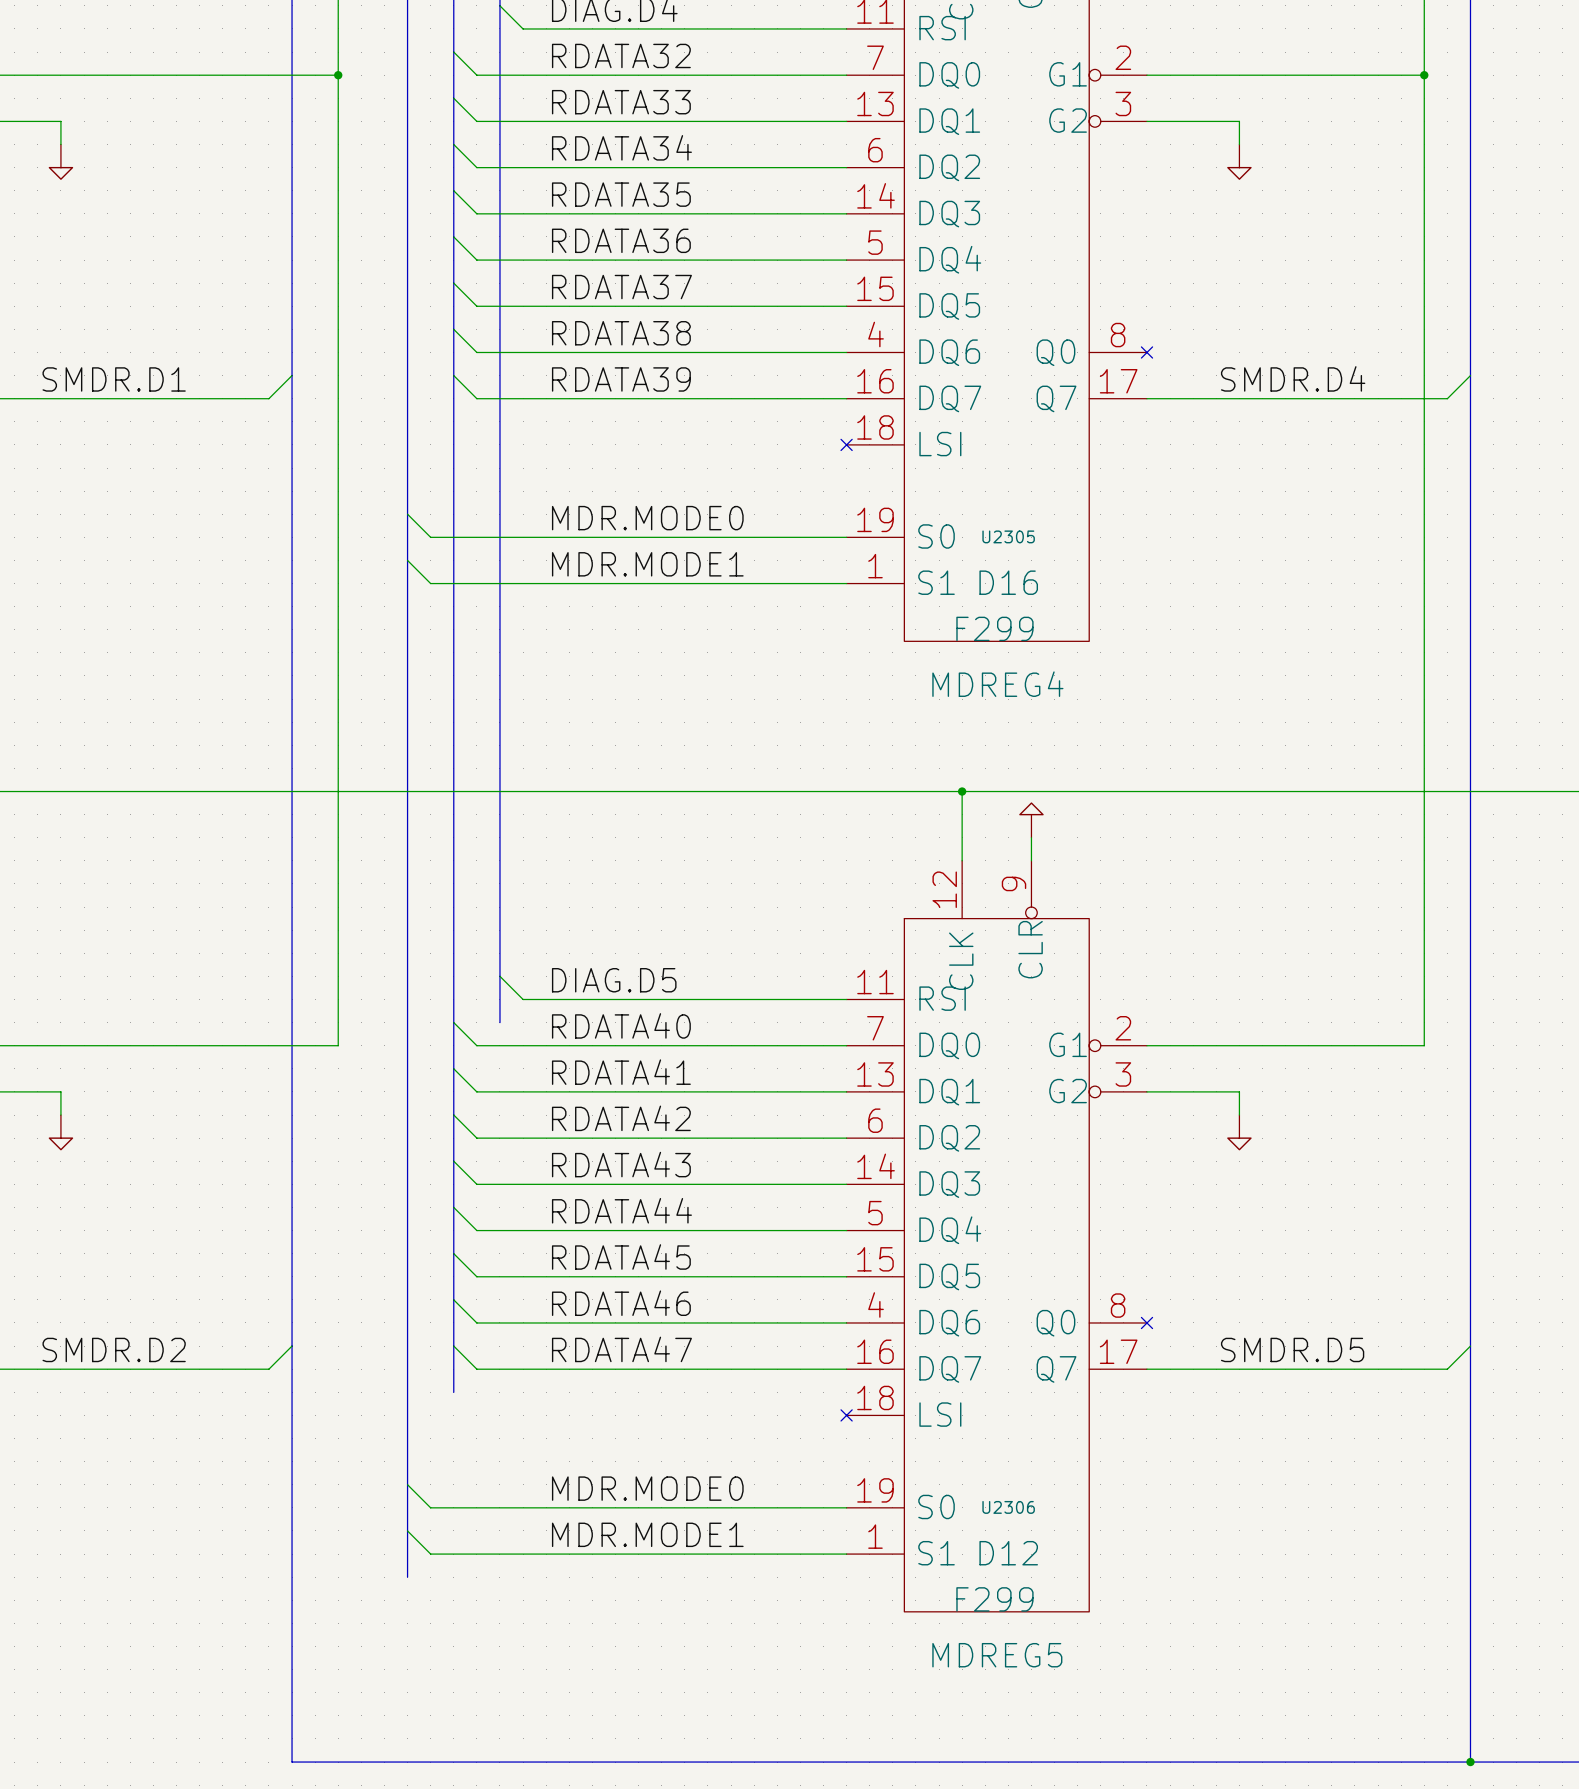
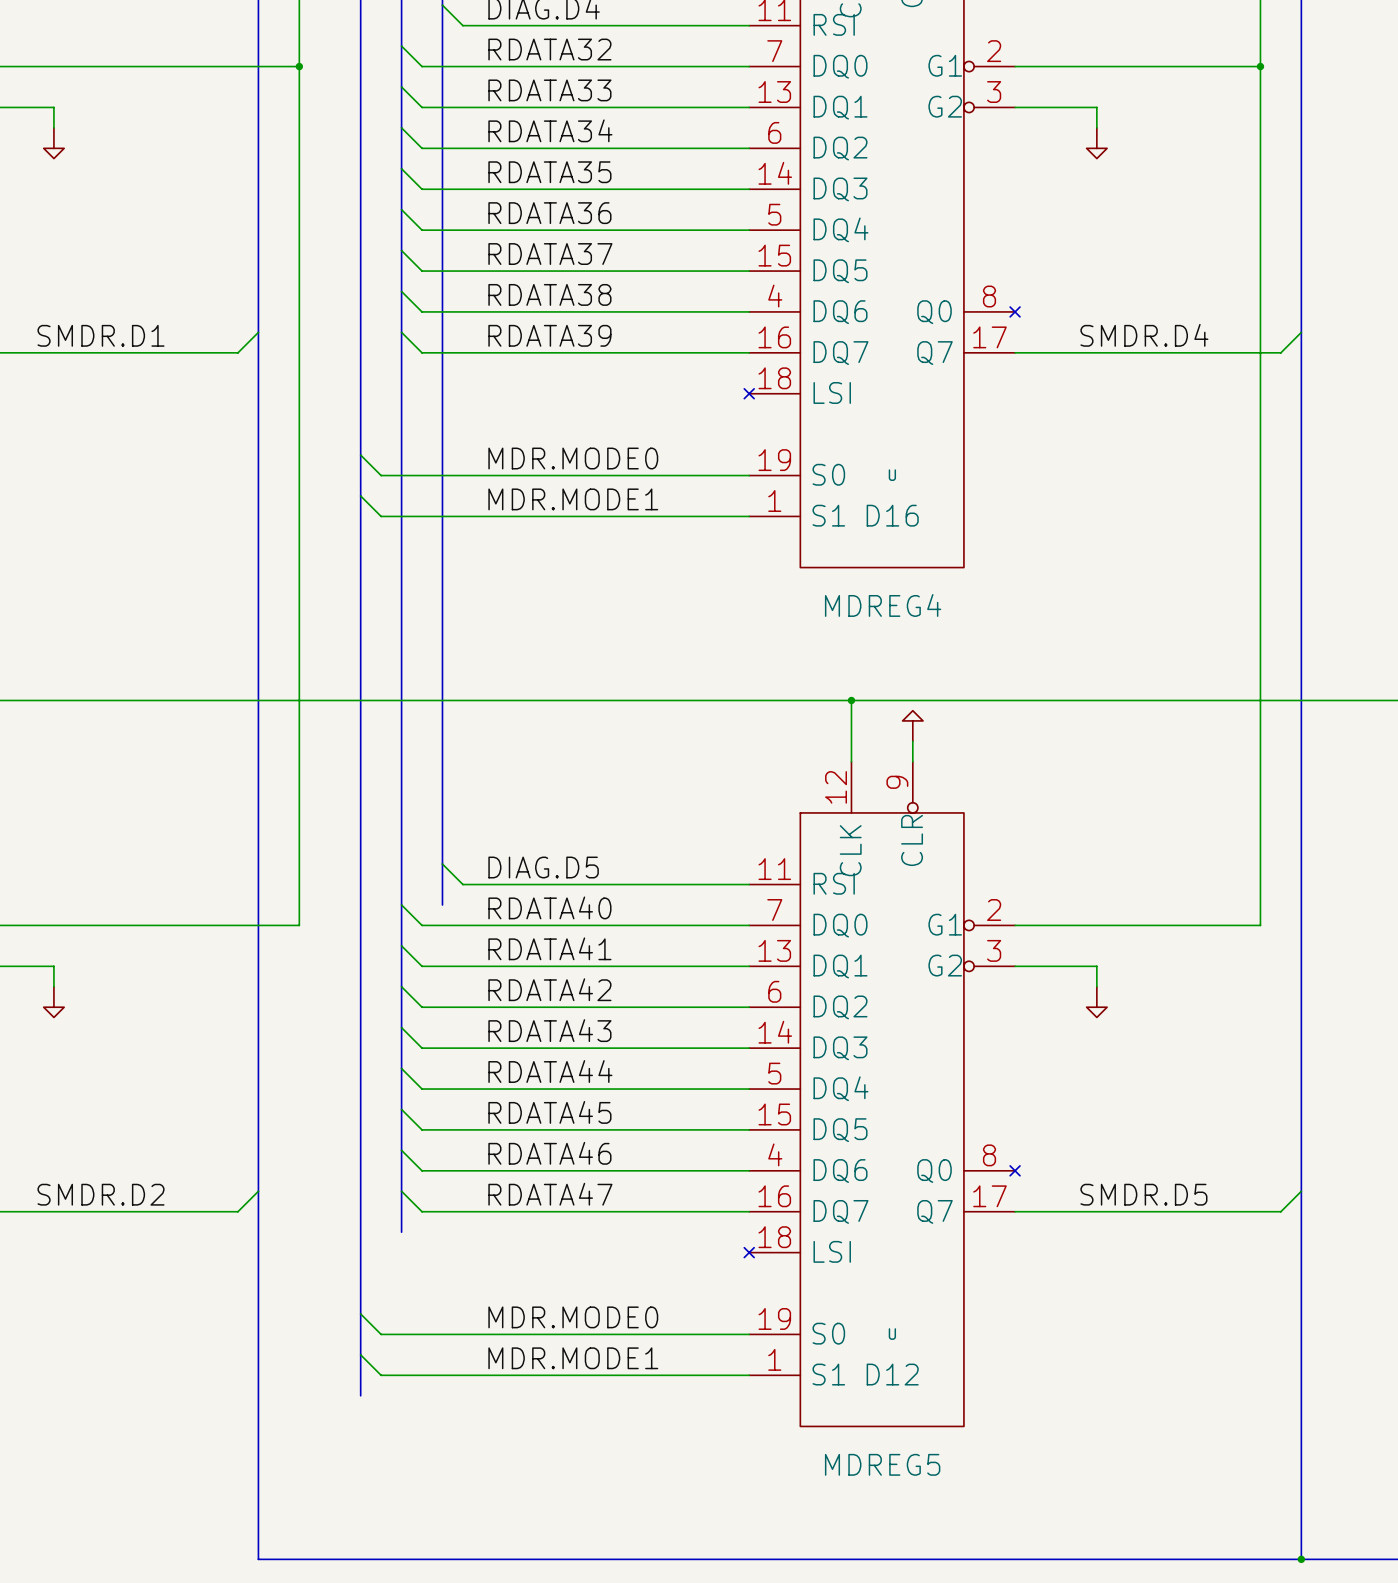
U2305 name: U2305 (1008, 536) -> U (892, 475)
U2305 value: F299 (994, 628) -> none
U2306 name: U2306 (1008, 1507) -> U (892, 1334)
U2306 value: F299 (994, 1599) -> none

